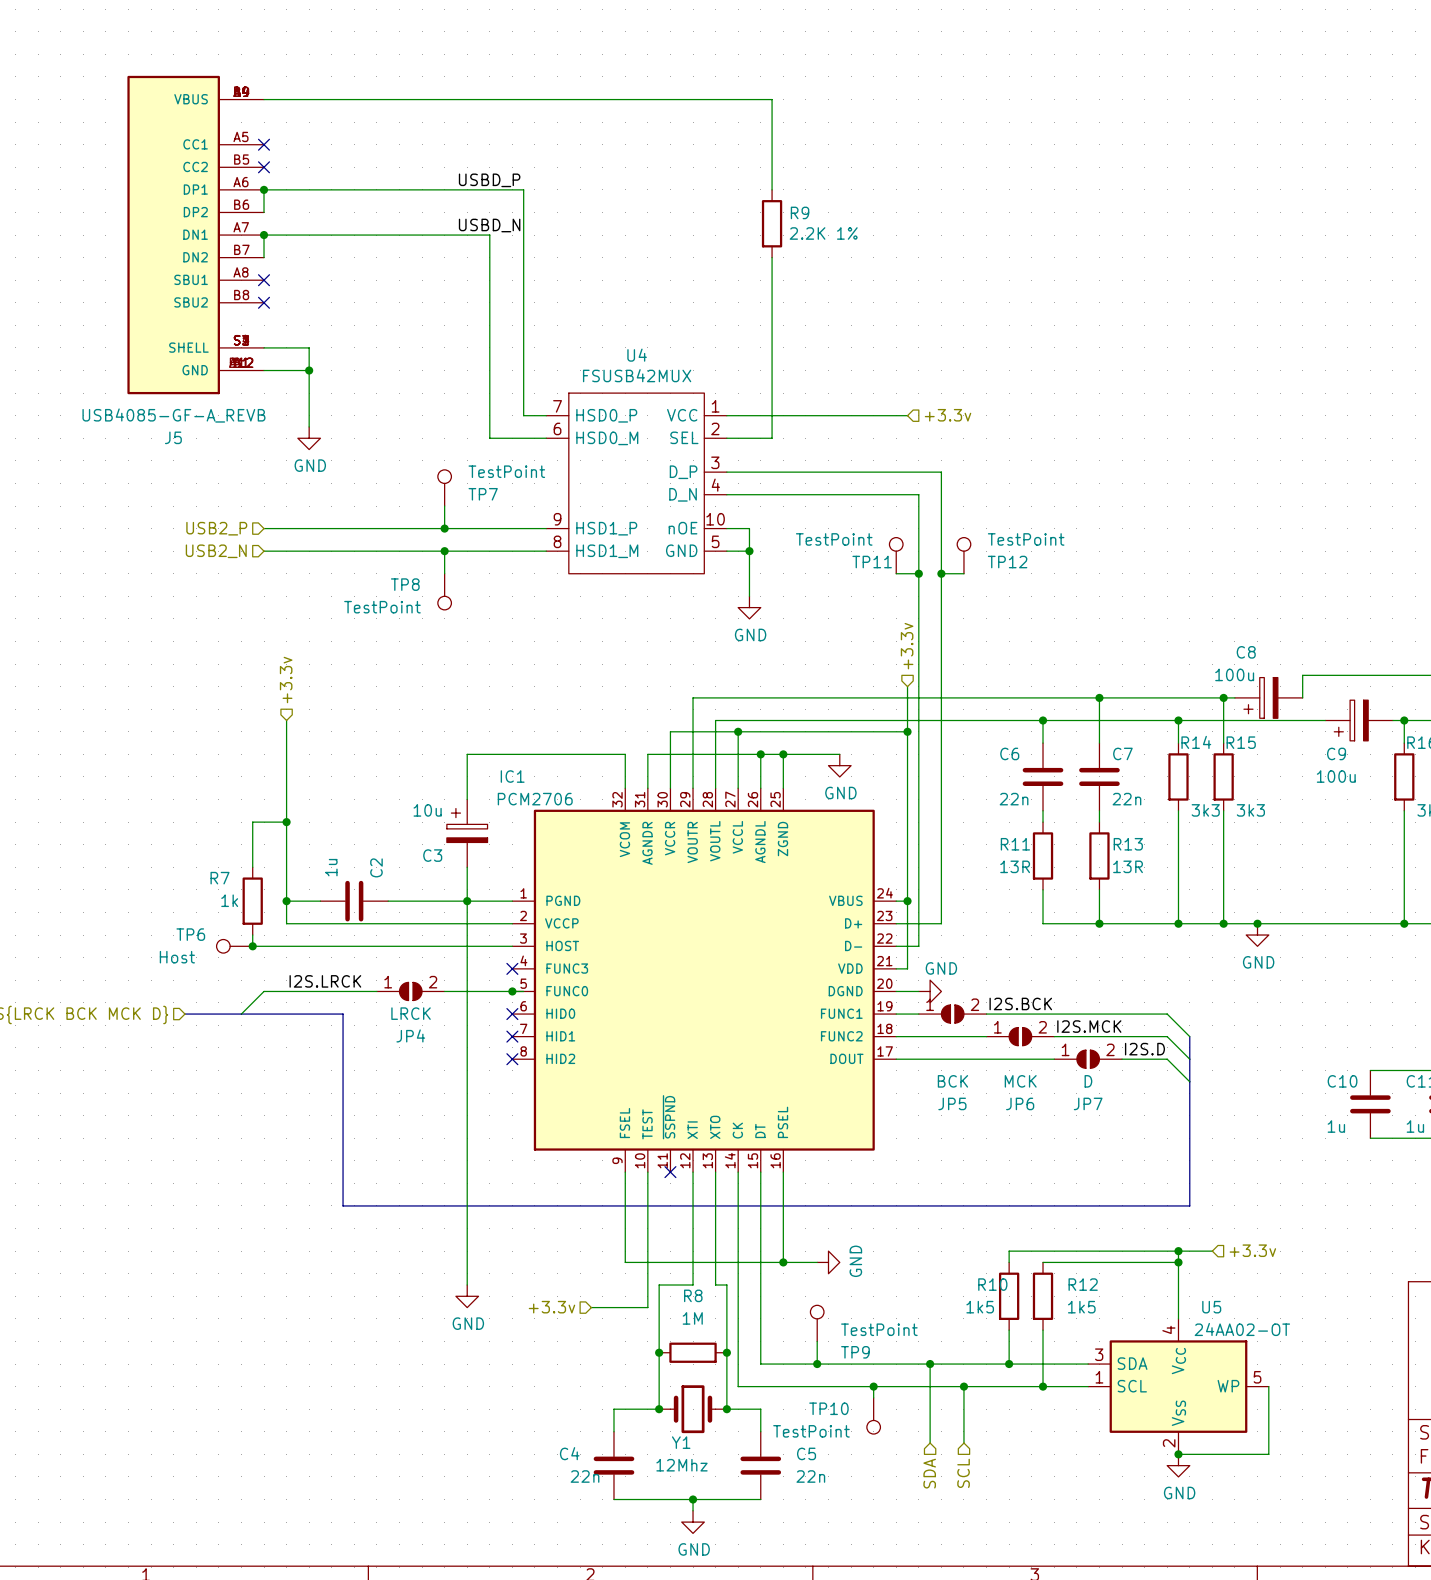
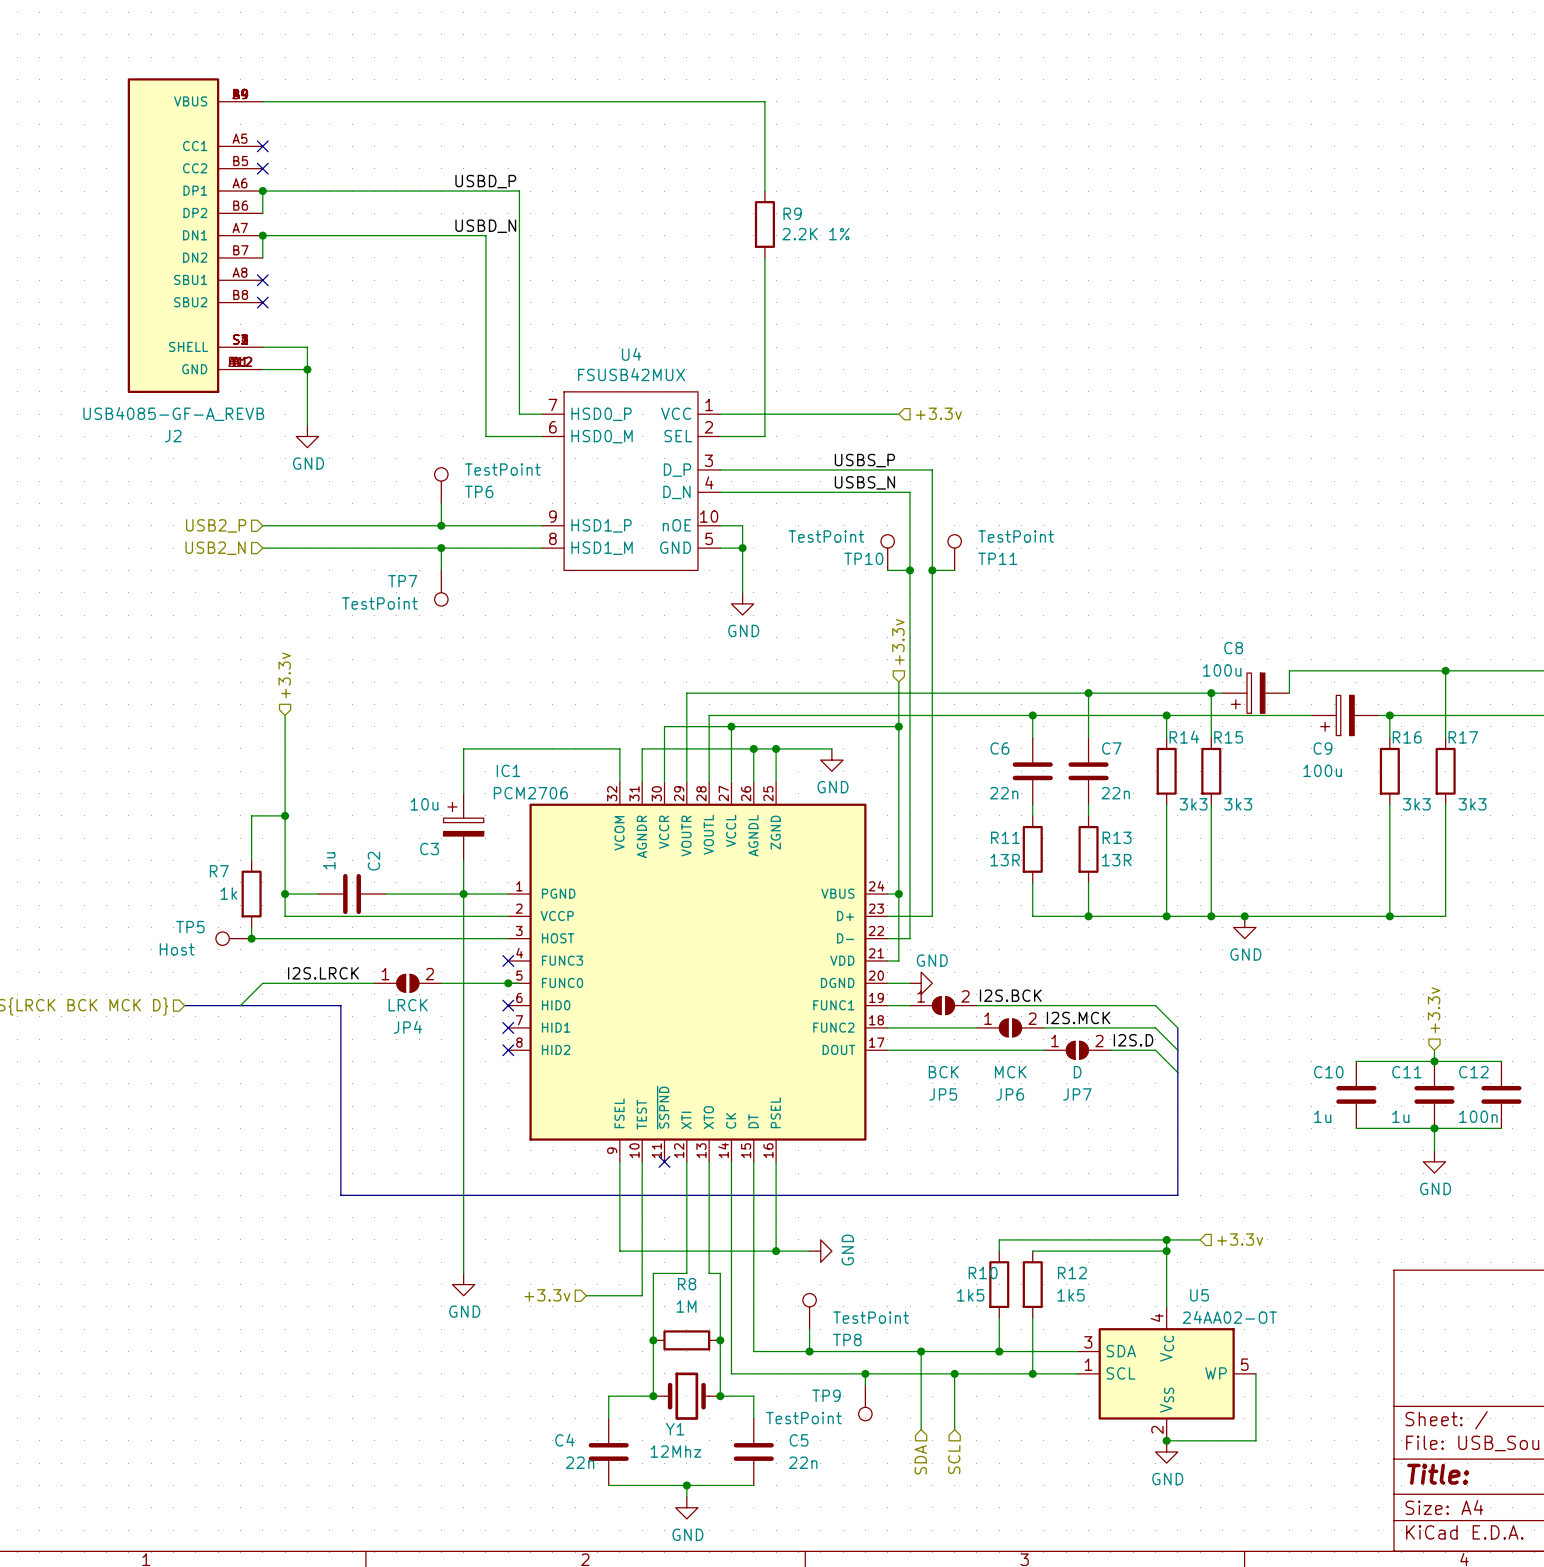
J5 name: J5 (173, 437) -> J2 (173, 436)
label: none -> USBS_P (864, 460)
label: none -> USBS_N (864, 482)
TP7 name: TP7 (483, 494) -> TP6 (479, 491)
TP11 name: TP11 (872, 562) -> TP10 (863, 558)
TP12 name: TP12 (1007, 562) -> TP11 (997, 558)
TP8 name: TP8 (405, 584) -> TP7 (402, 581)
TP6 name: TP6 (190, 934) -> TP5 (190, 927)
TP9 name: TP9 (855, 1352) -> TP8 (847, 1339)
TP10 name: TP10 (828, 1408) -> TP9 (826, 1395)

